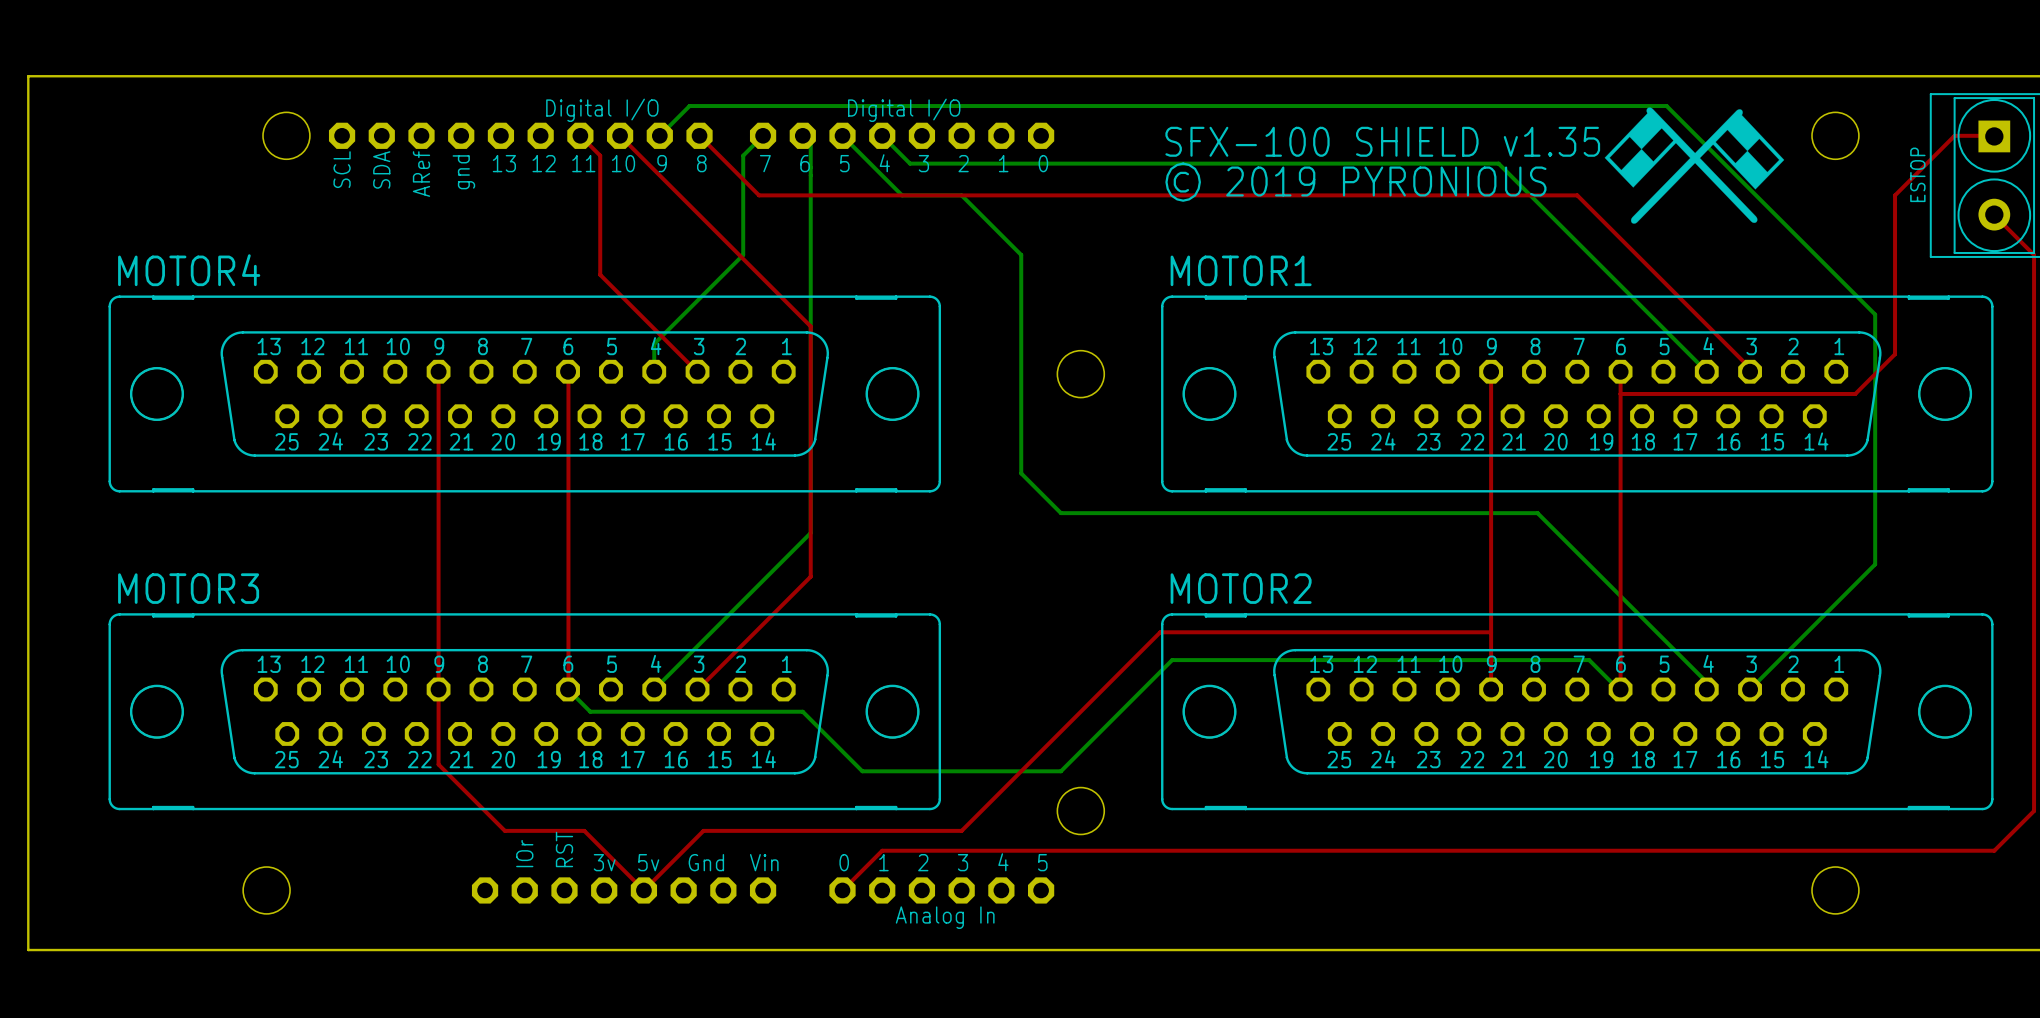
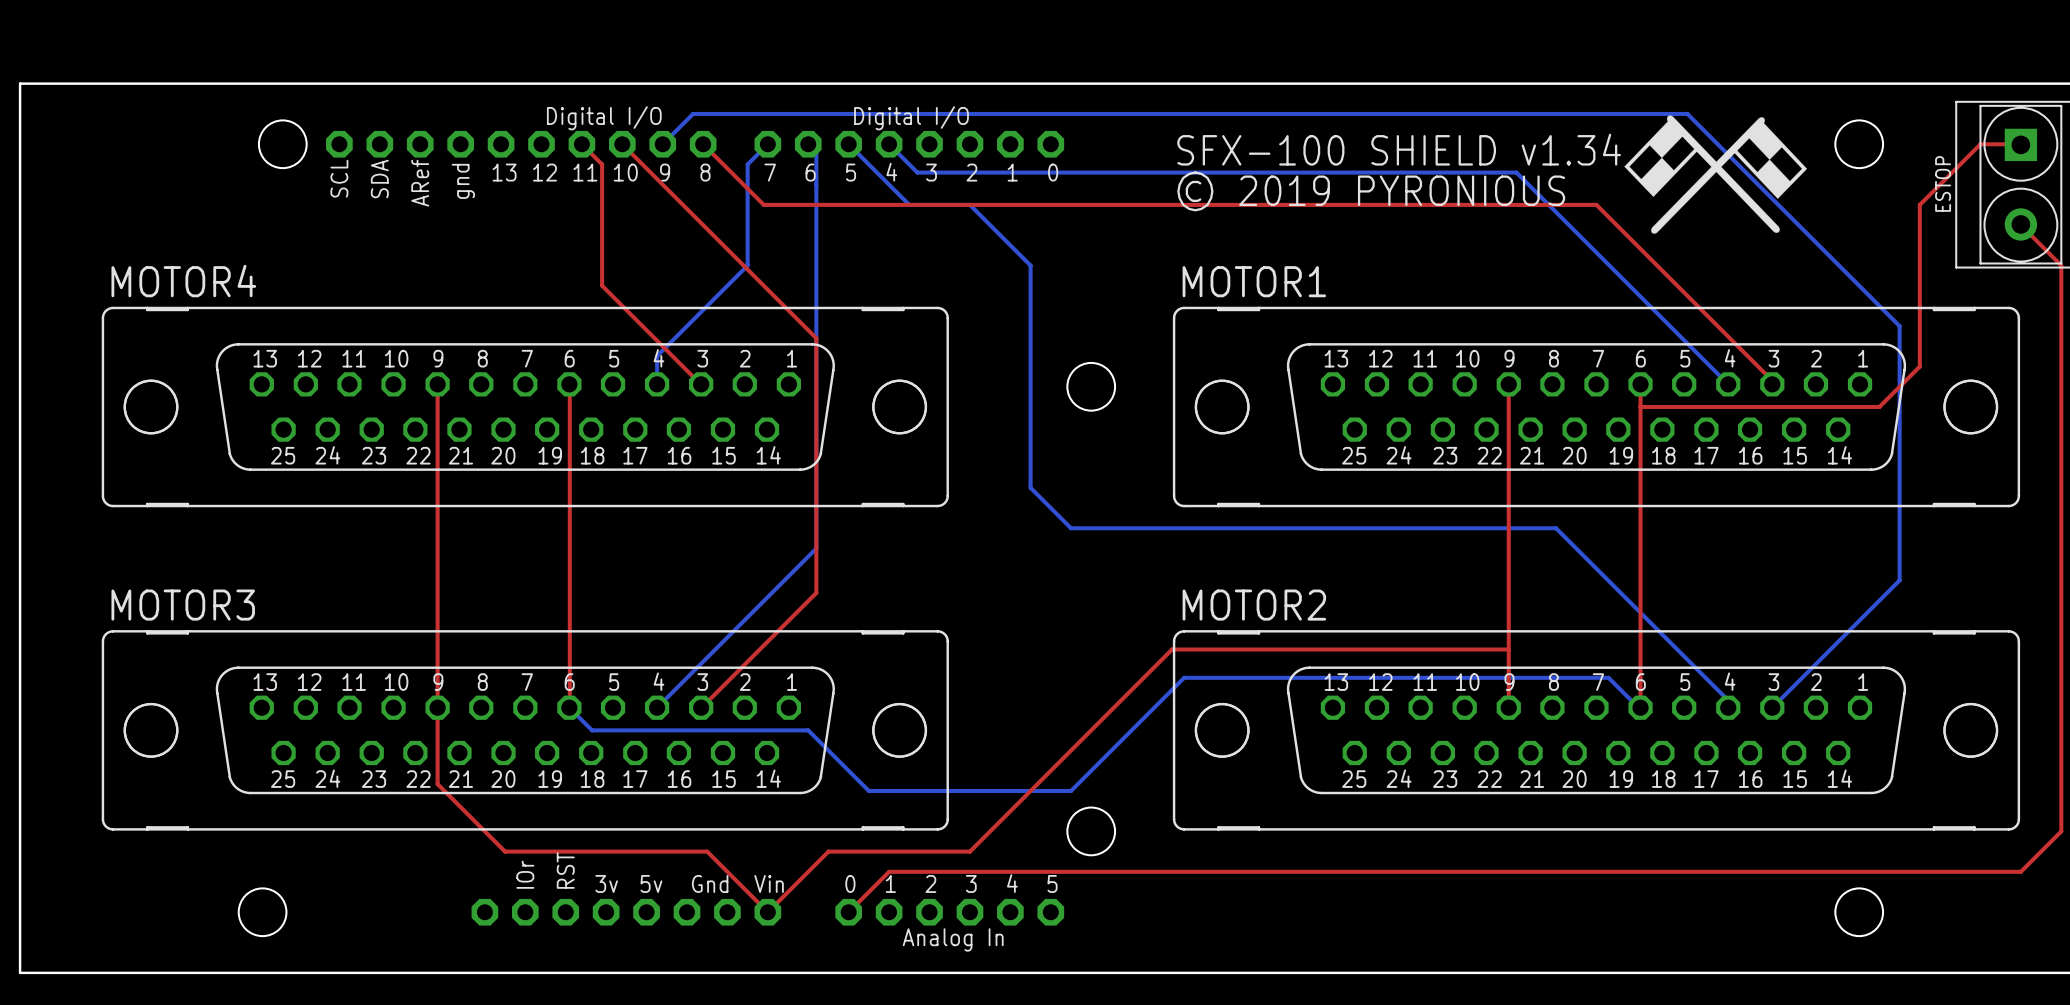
text: SFX-100 SHIELD v1.35 (1382, 141) -> SFX-100 SHIELD v1.34 (1399, 149)
top track: (584, 830) (643, 890) (703, 830) (822, 830) -> (585, 851) (707, 851) (767, 912) (828, 851)

